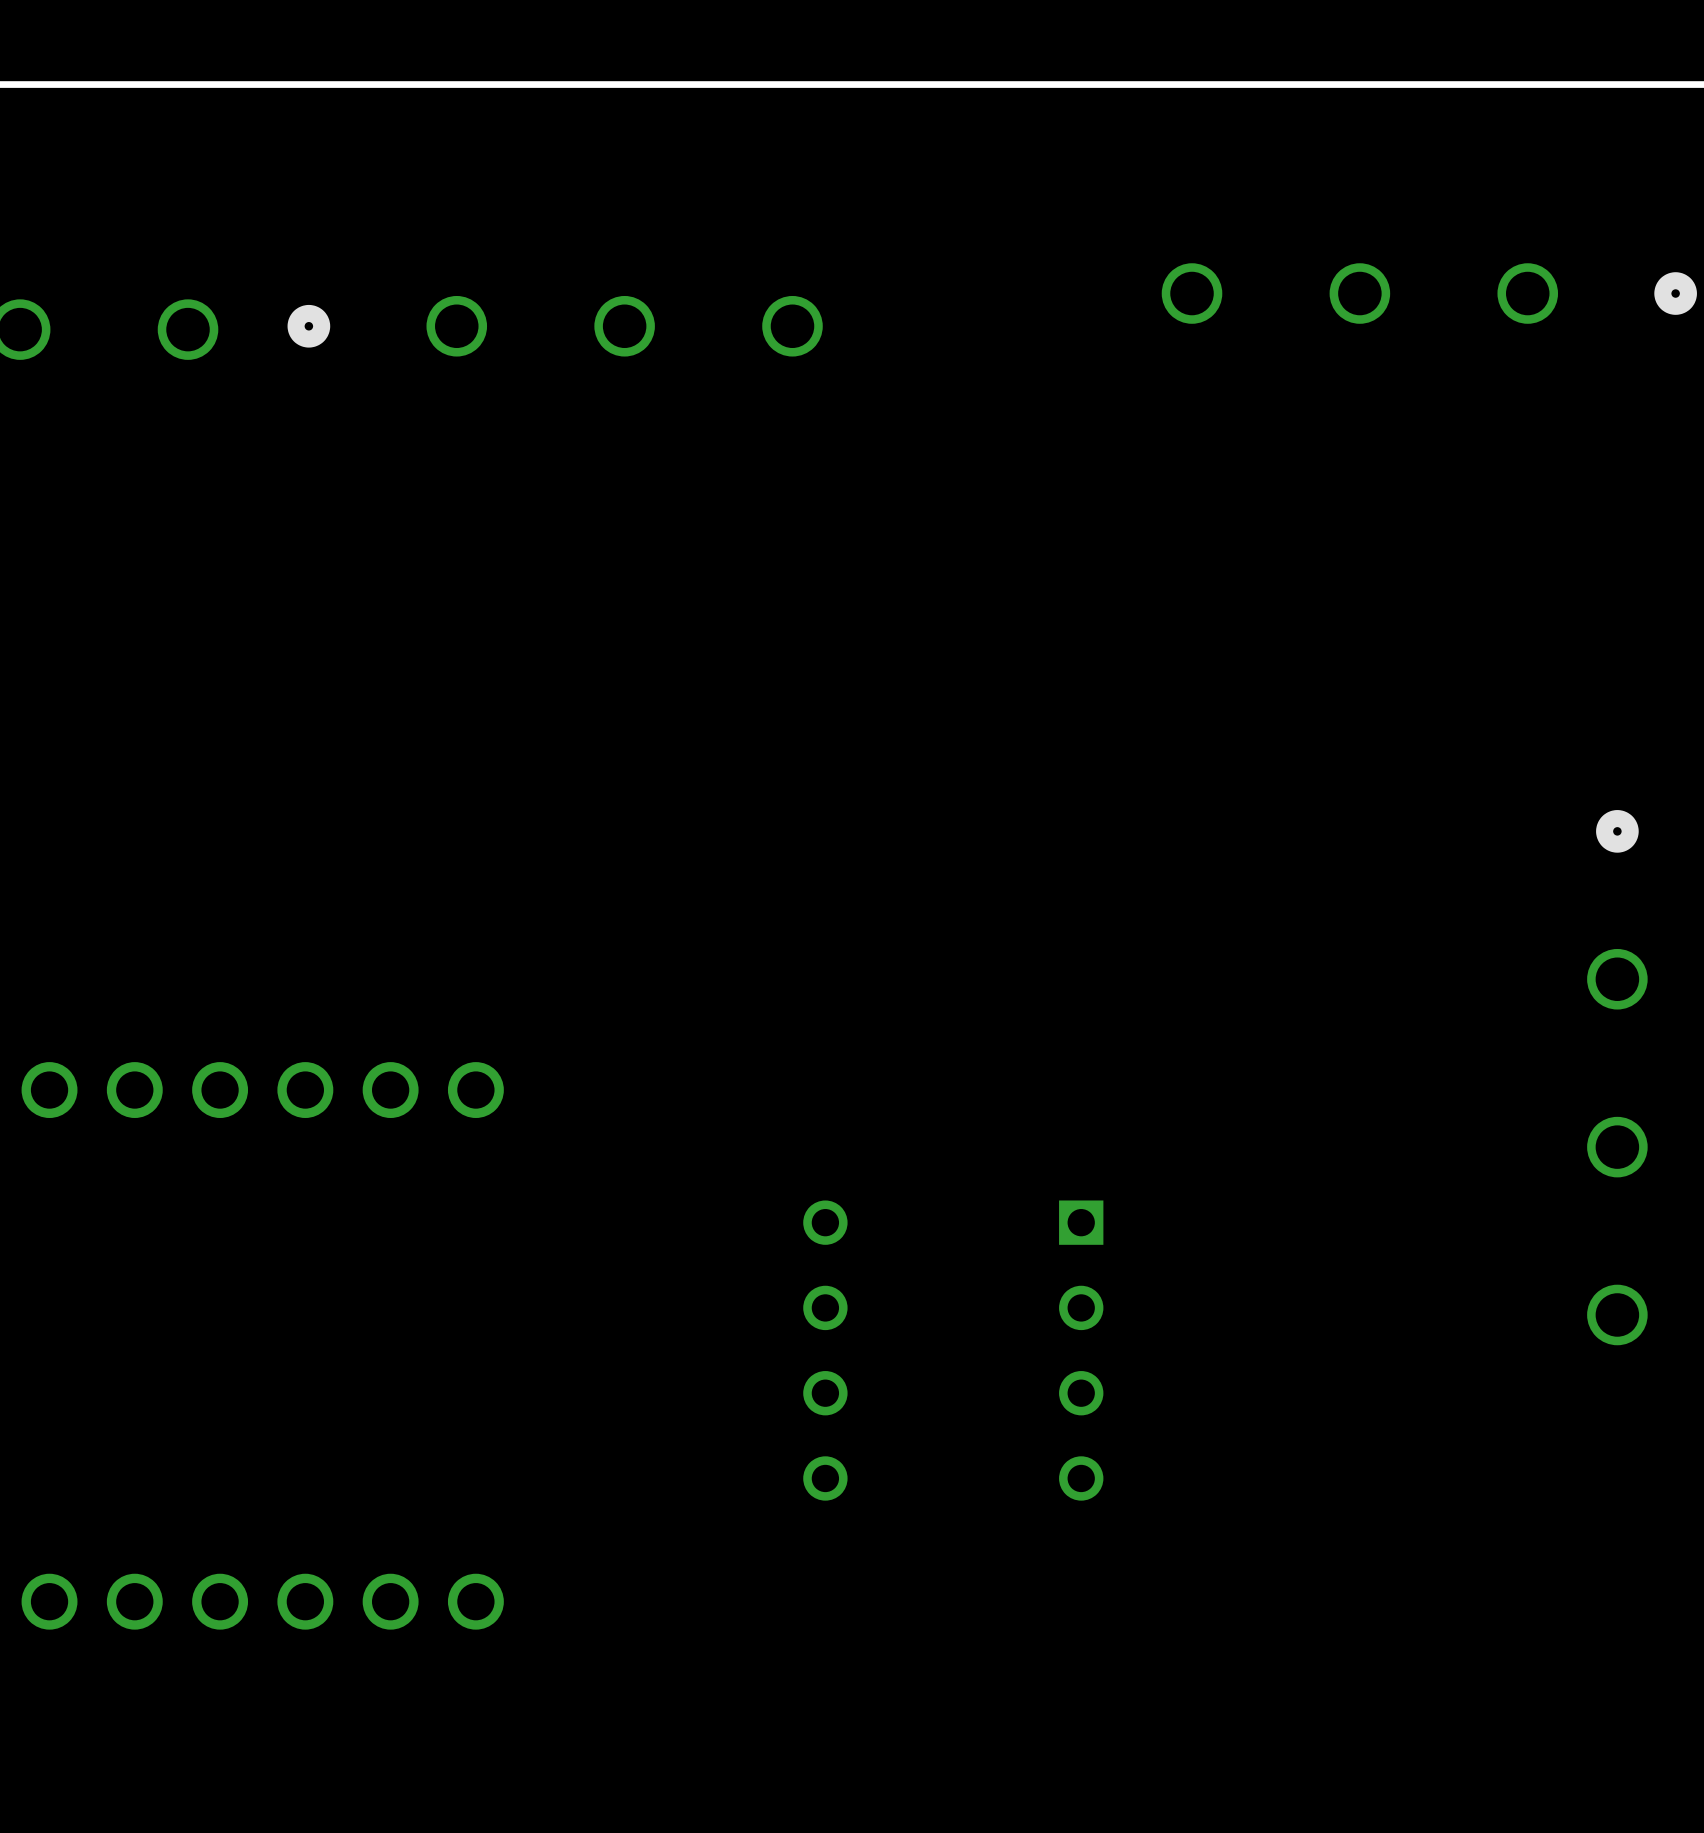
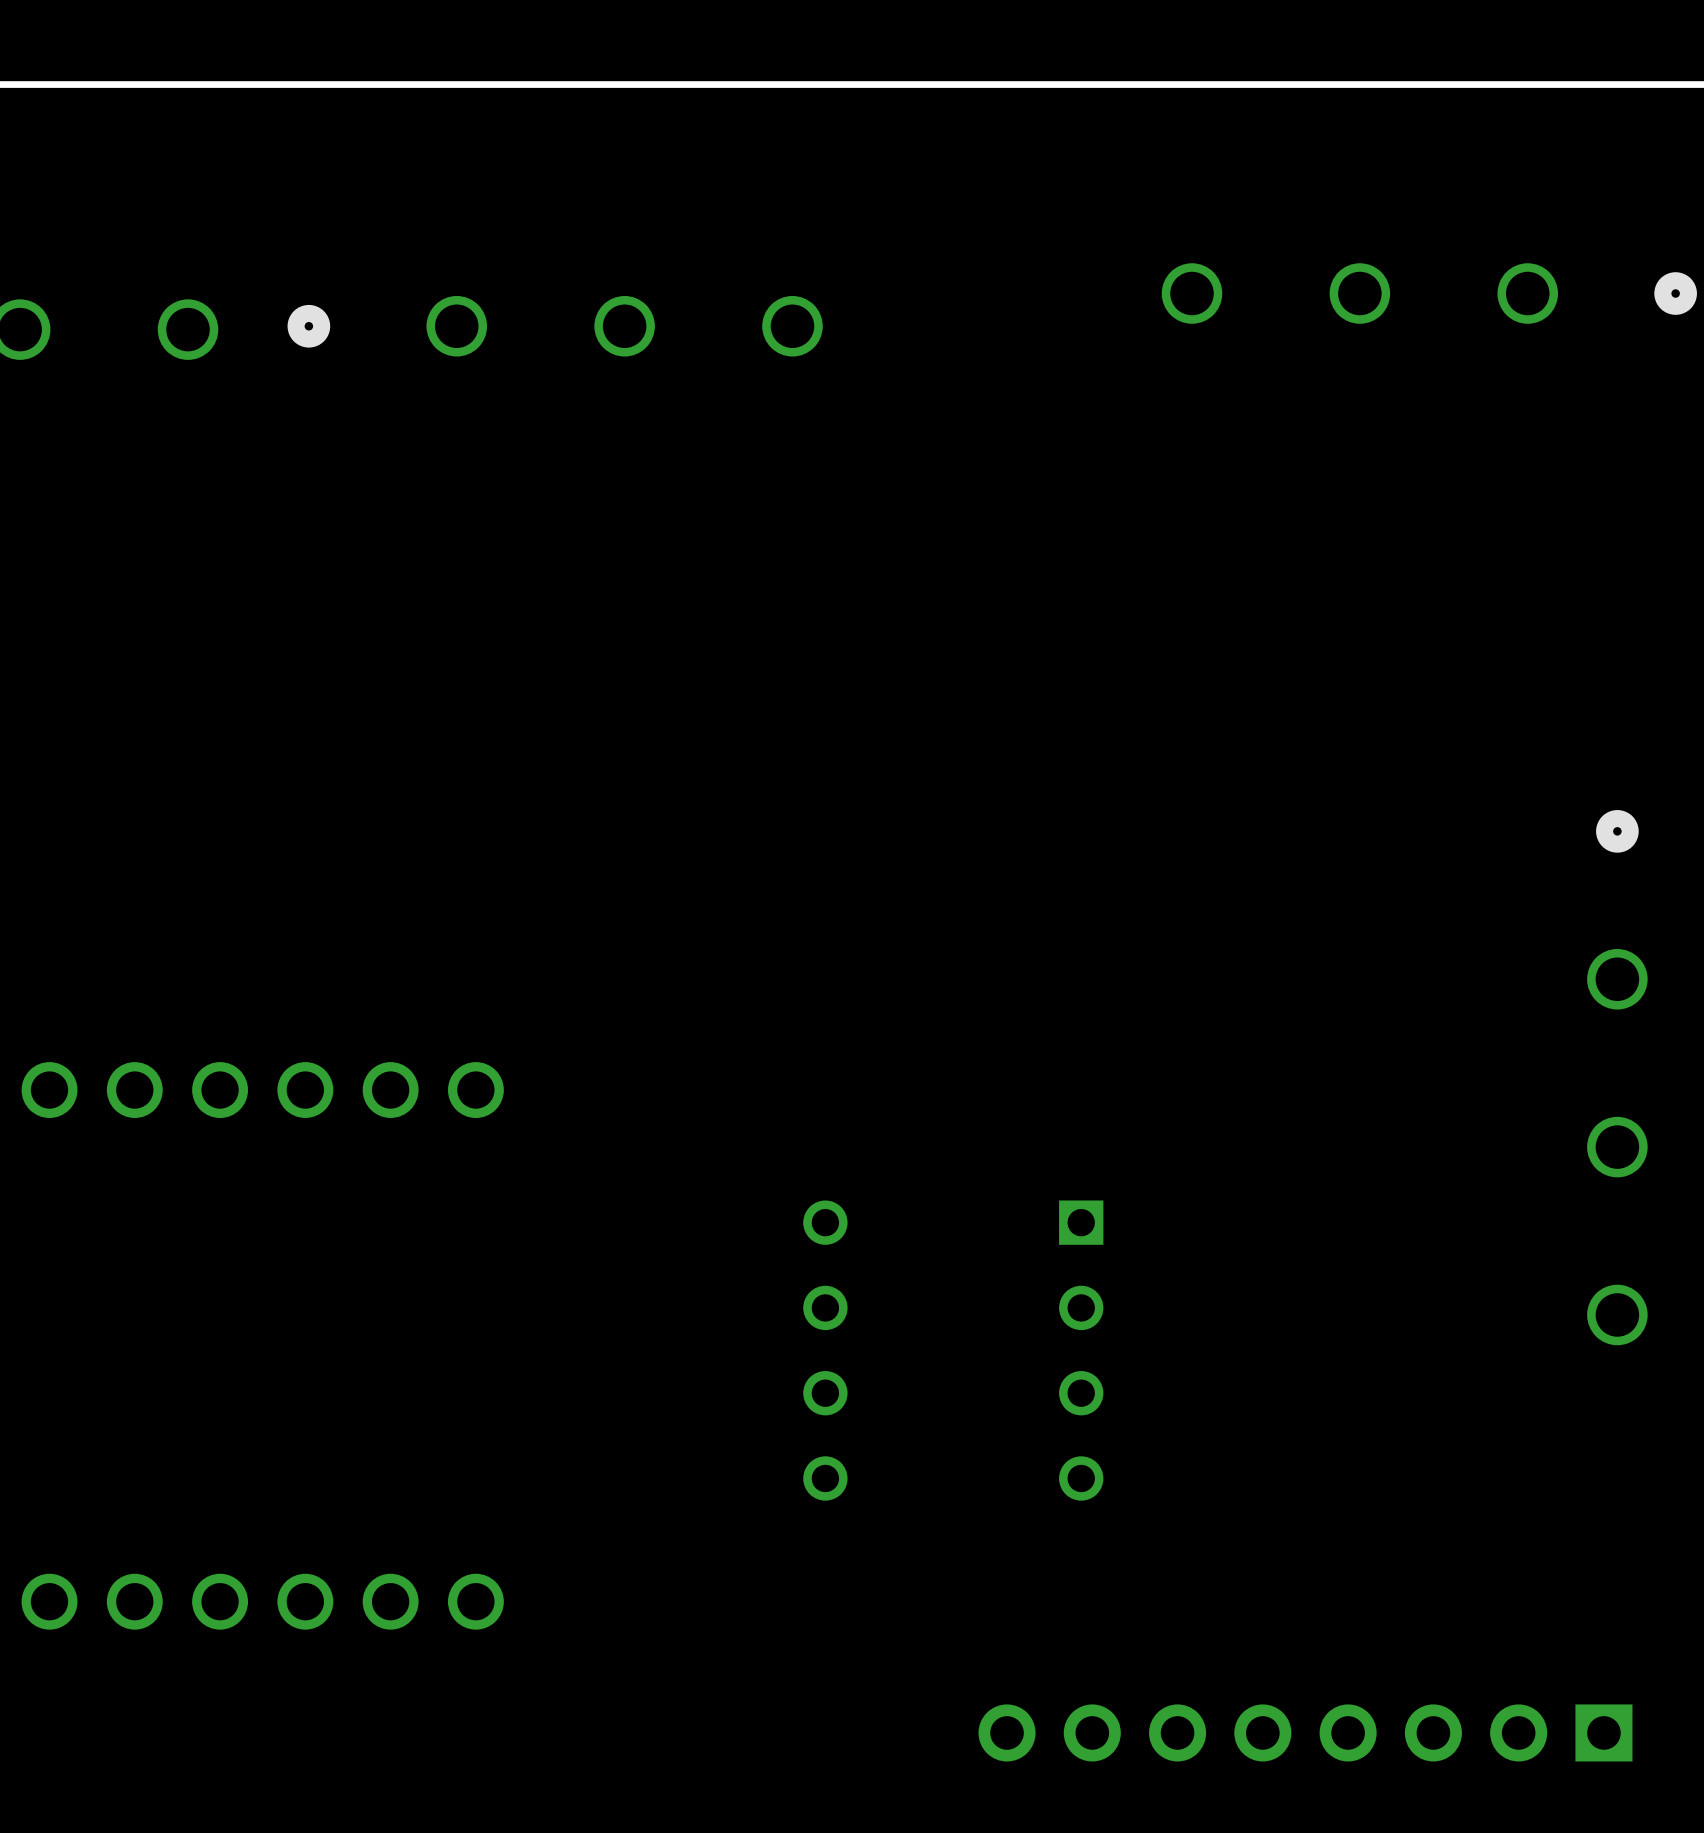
part: none -> (1305, 1732)

